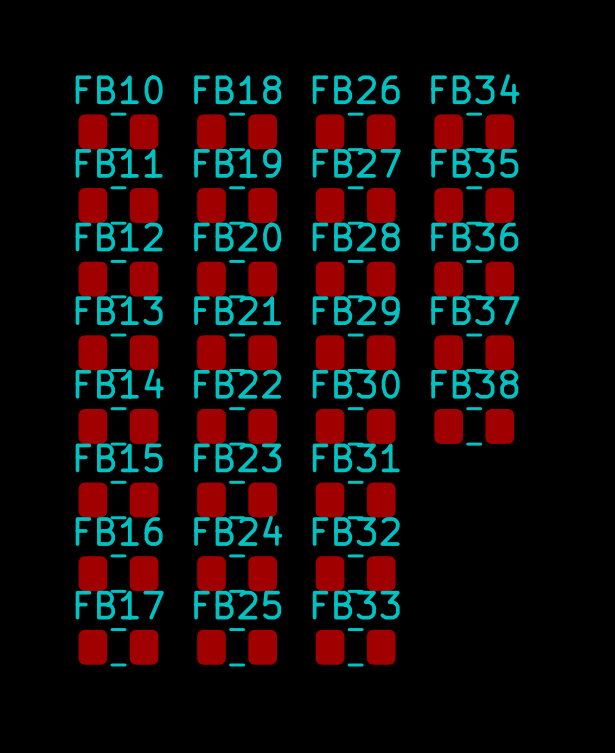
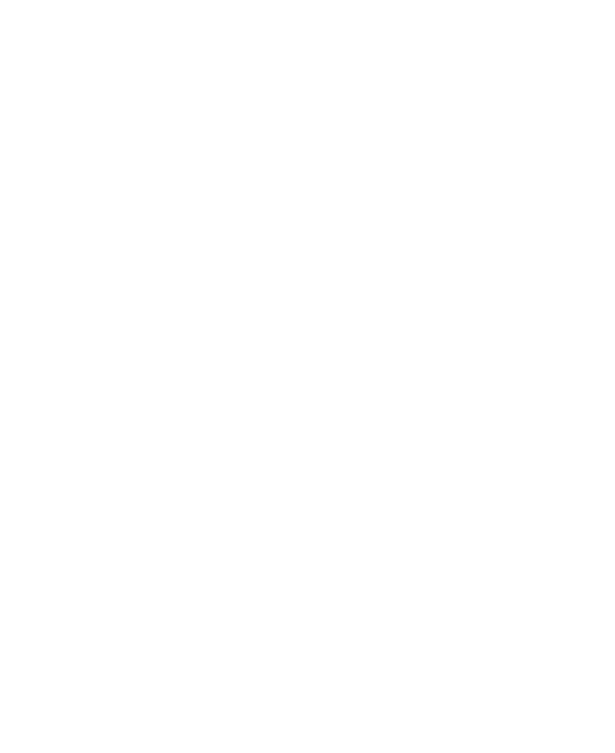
FB10: (118, 131) -> none
FB18: (237, 131) -> none
FB26: (355, 131) -> none
FB34: (474, 131) -> none
FB11: (118, 205) -> none
FB19: (237, 205) -> none
FB27: (355, 205) -> none
FB35: (474, 205) -> none
FB12: (118, 279) -> none
FB20: (237, 279) -> none
FB28: (355, 279) -> none
FB36: (474, 279) -> none
FB13: (118, 352) -> none
FB21: (237, 352) -> none
FB29: (355, 352) -> none
FB37: (474, 352) -> none
FB14: (118, 426) -> none
FB22: (237, 426) -> none
FB30: (355, 426) -> none
FB38: (474, 426) -> none
FB15: (118, 500) -> none
FB23: (237, 500) -> none
FB31: (355, 500) -> none
FB16: (118, 573) -> none
FB24: (237, 573) -> none
FB32: (355, 573) -> none
FB17: (118, 647) -> none
FB25: (237, 647) -> none
FB33: (355, 647) -> none

